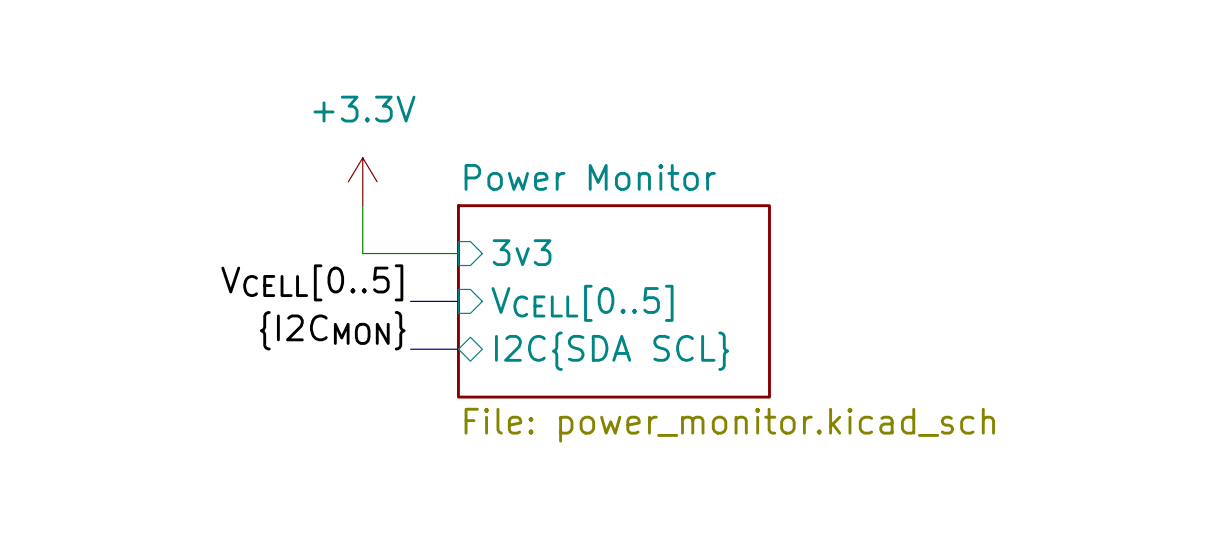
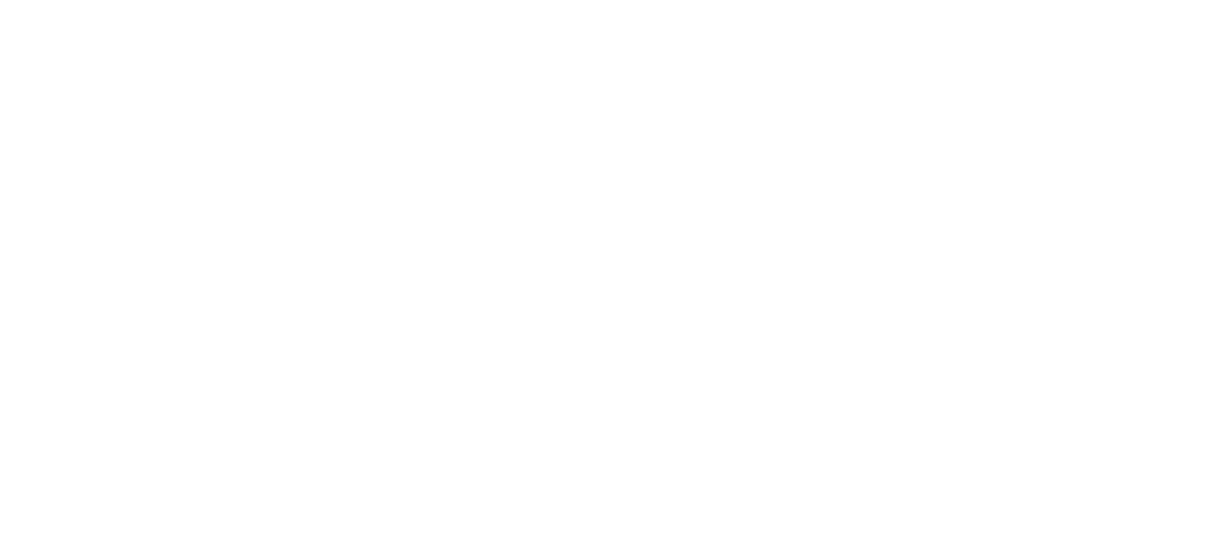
power symbol: +3.3V (362, 181) -> none
wire: (362, 205) (362, 253) (458, 253) -> none
sheet pin: 3v3 (522, 252) -> none
label: VCELL[0..5] (312, 282) -> none
bus: (410, 301) (458, 301) -> none
sheet Power Monitor: File: power_monitor.kicad_sch (613, 301) -> none
sheet pin: VCELL[0..5] (582, 303) -> none
label: {I2CMON} (332, 330) -> none
bus: (410, 349) (458, 349) -> none
sheet pin: I2C{SDA SCL} (612, 351) -> none

